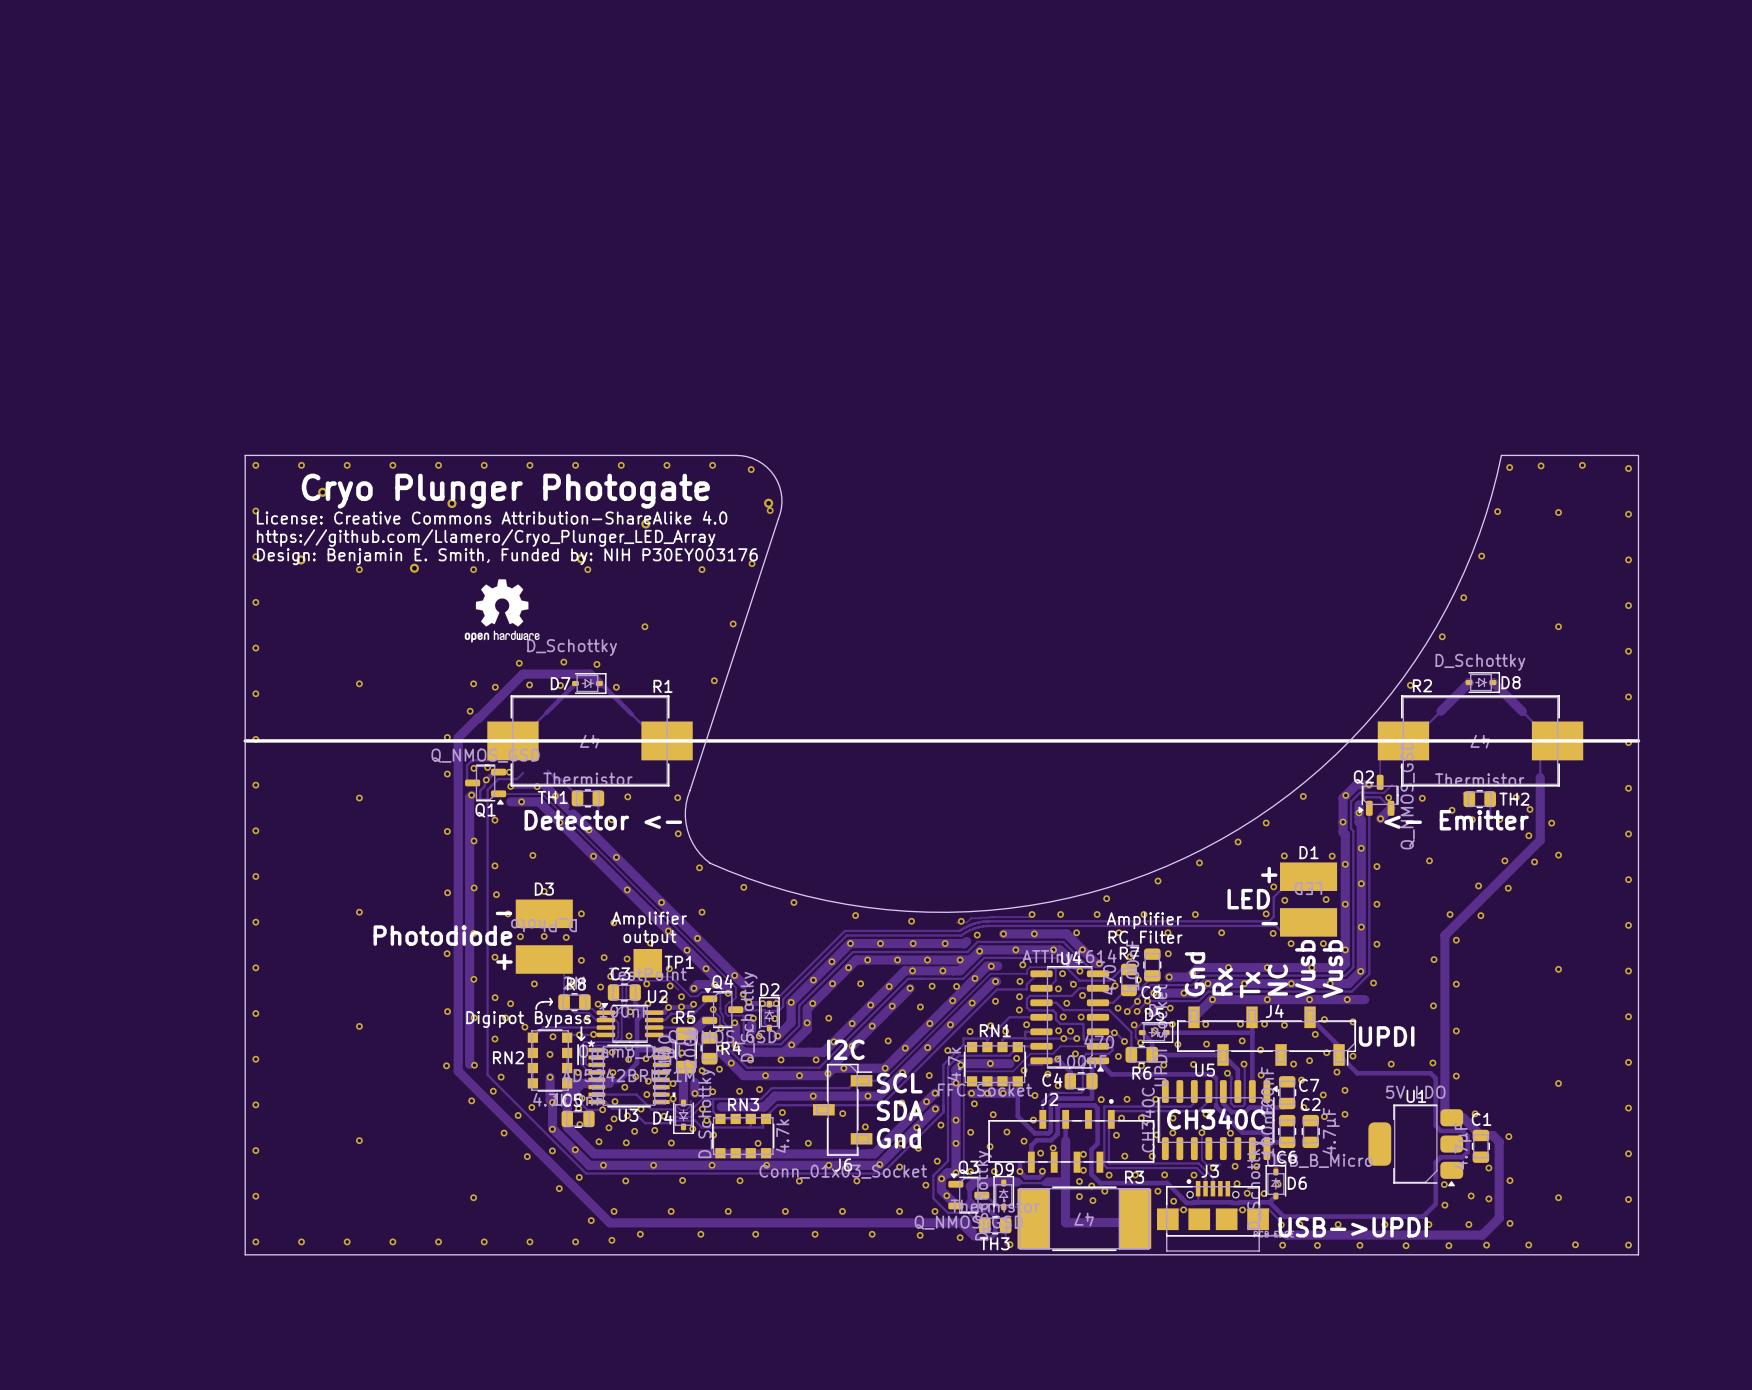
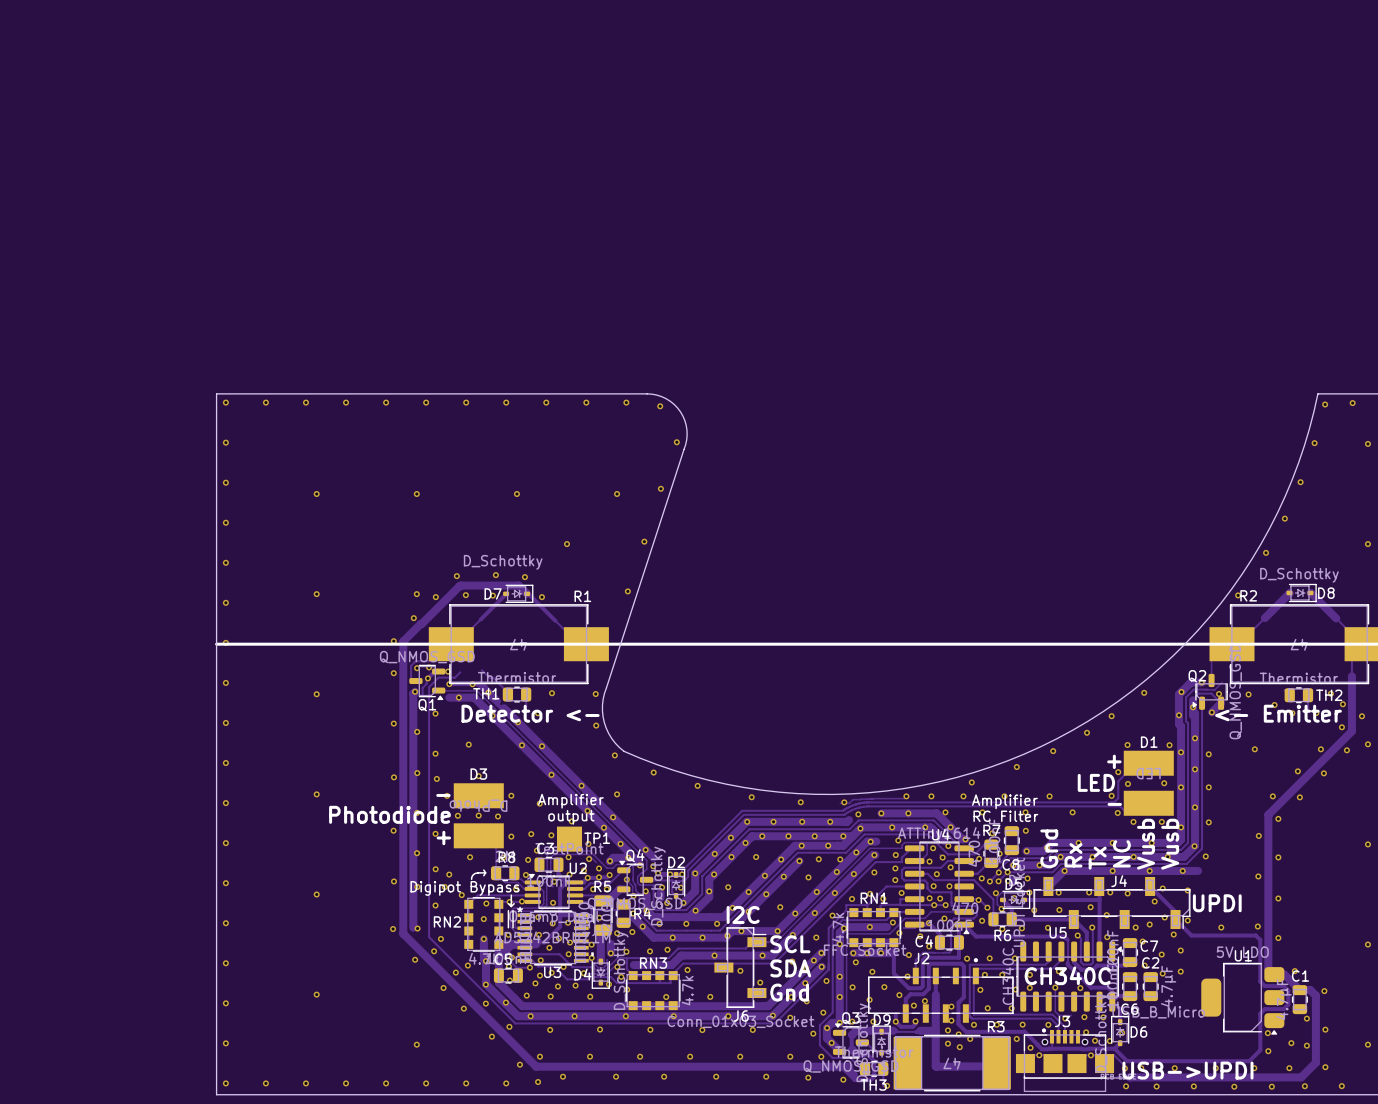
text: Cryo Plunger Photogate (505, 491) -> none
via: (322, 492) -> none
via: (451, 503) -> none
via: (768, 503) -> none
text: License: Creative Commons Attribution-ShareAlike 4.0 (492, 517) -> none
via: (645, 523) -> none
text: https://github.com/Llamero/Cryo_Plunger_LED_Array (486, 538) -> none
text: Design: Benjamin E. Smith, Funded by: NIH P30EY003176 (507, 556) -> none
via: (581, 558) -> none
via: (301, 559) -> none
via: (414, 568) -> none
drawing: [464, 579, 540, 643] -> none

